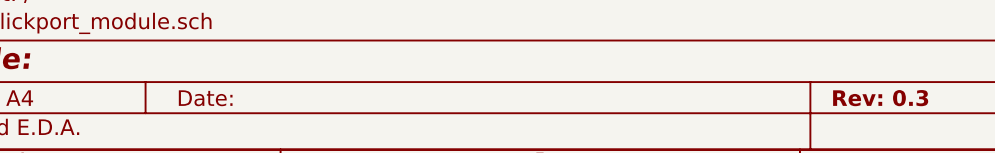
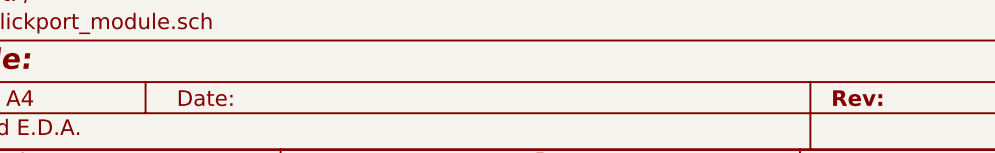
title block: Rev: 0.3 (880, 98) -> Rev: (857, 98)

